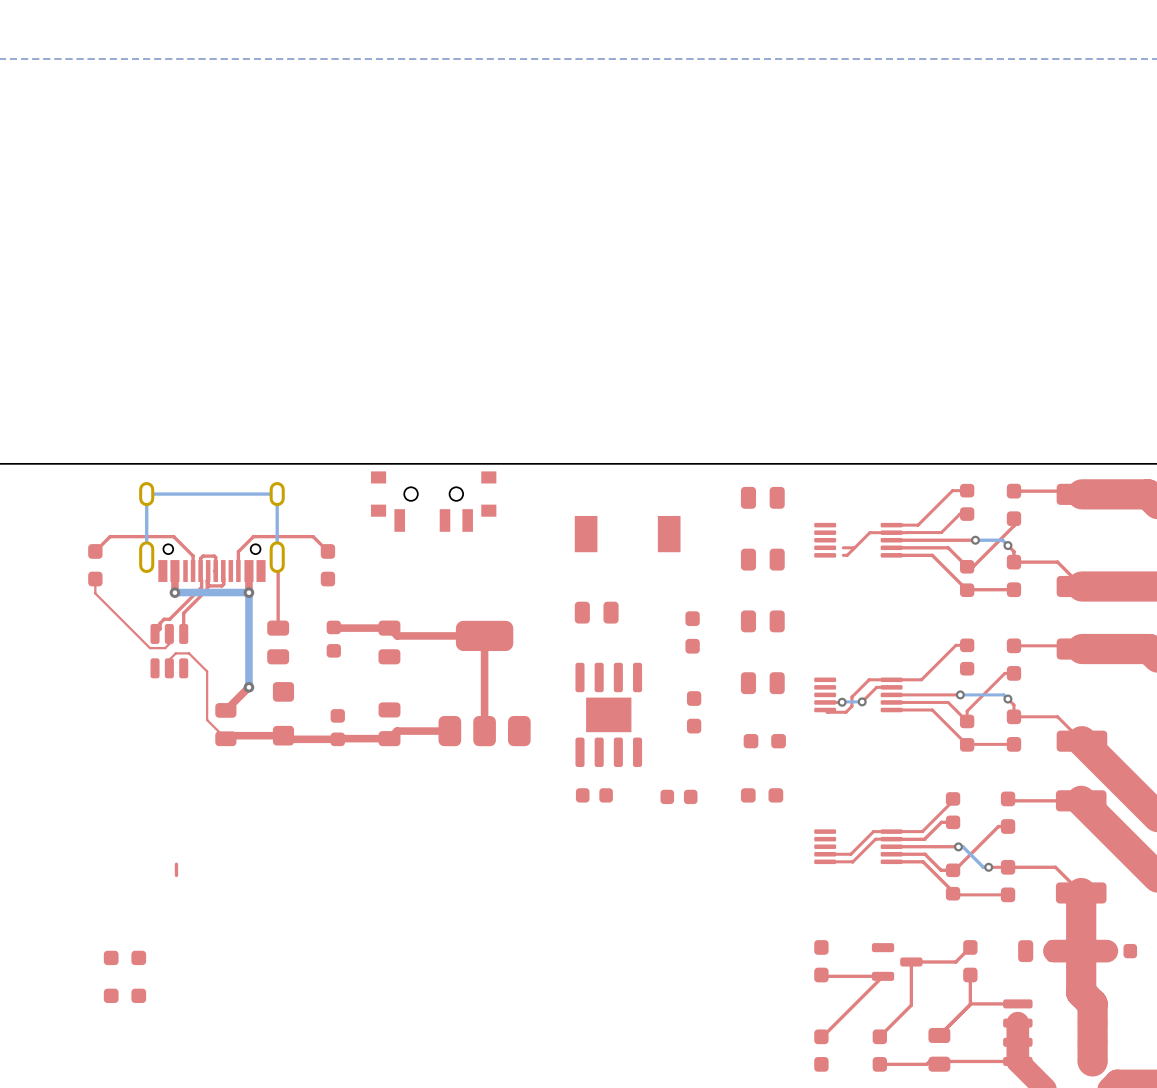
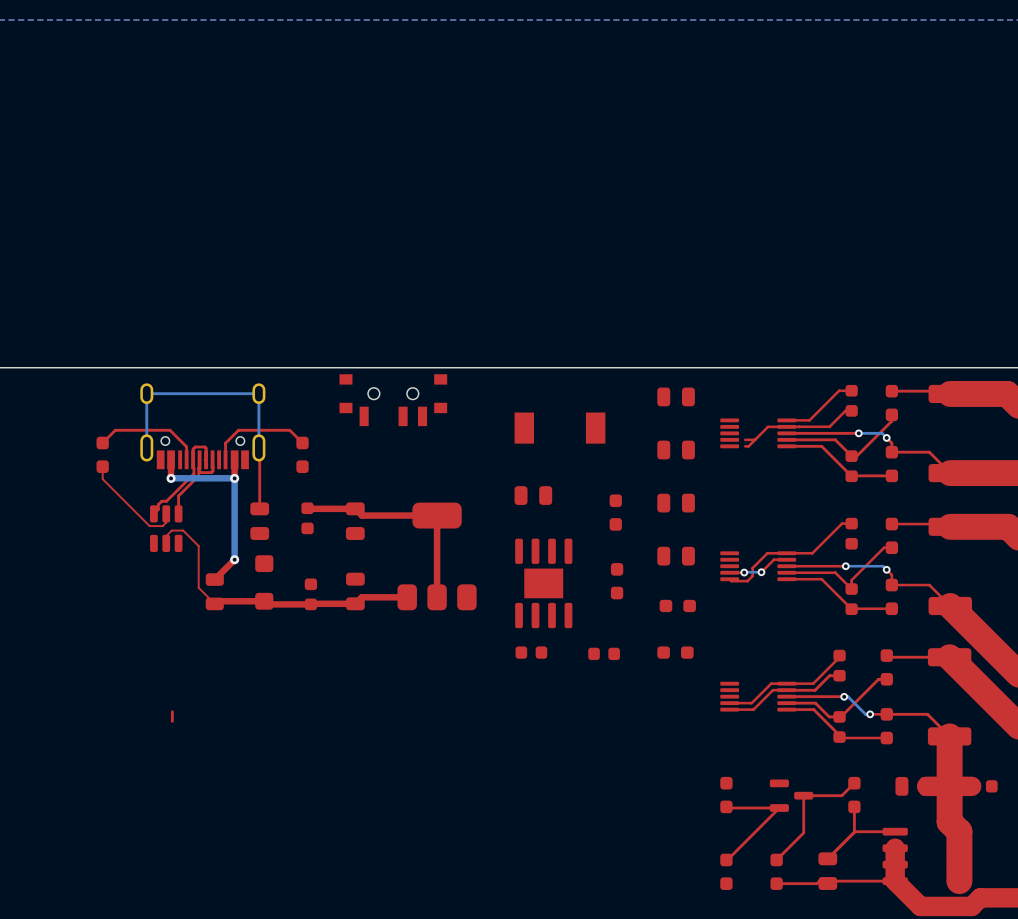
part: (124, 957) -> none
part: (124, 995) -> none

